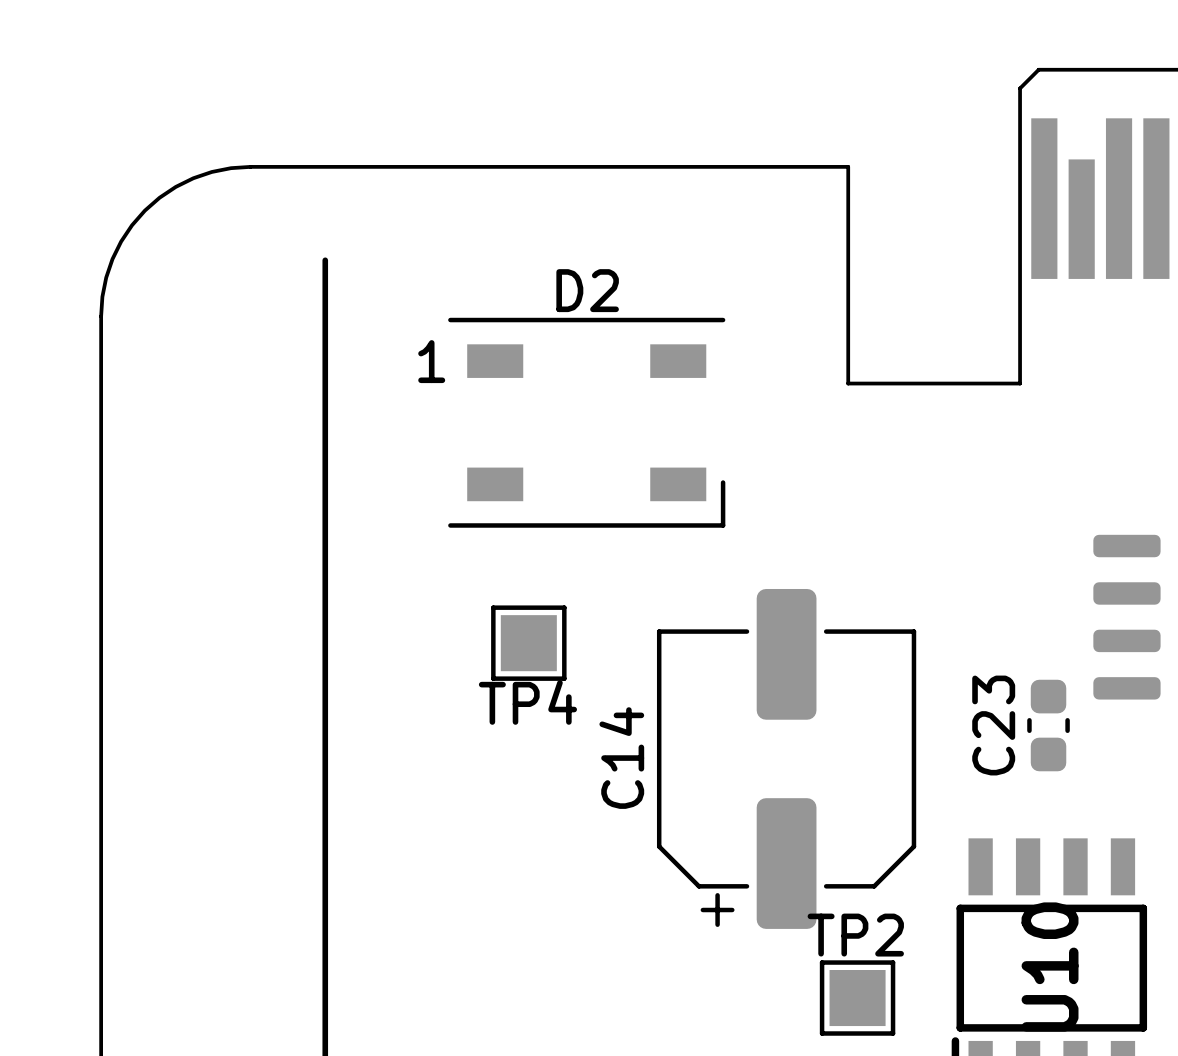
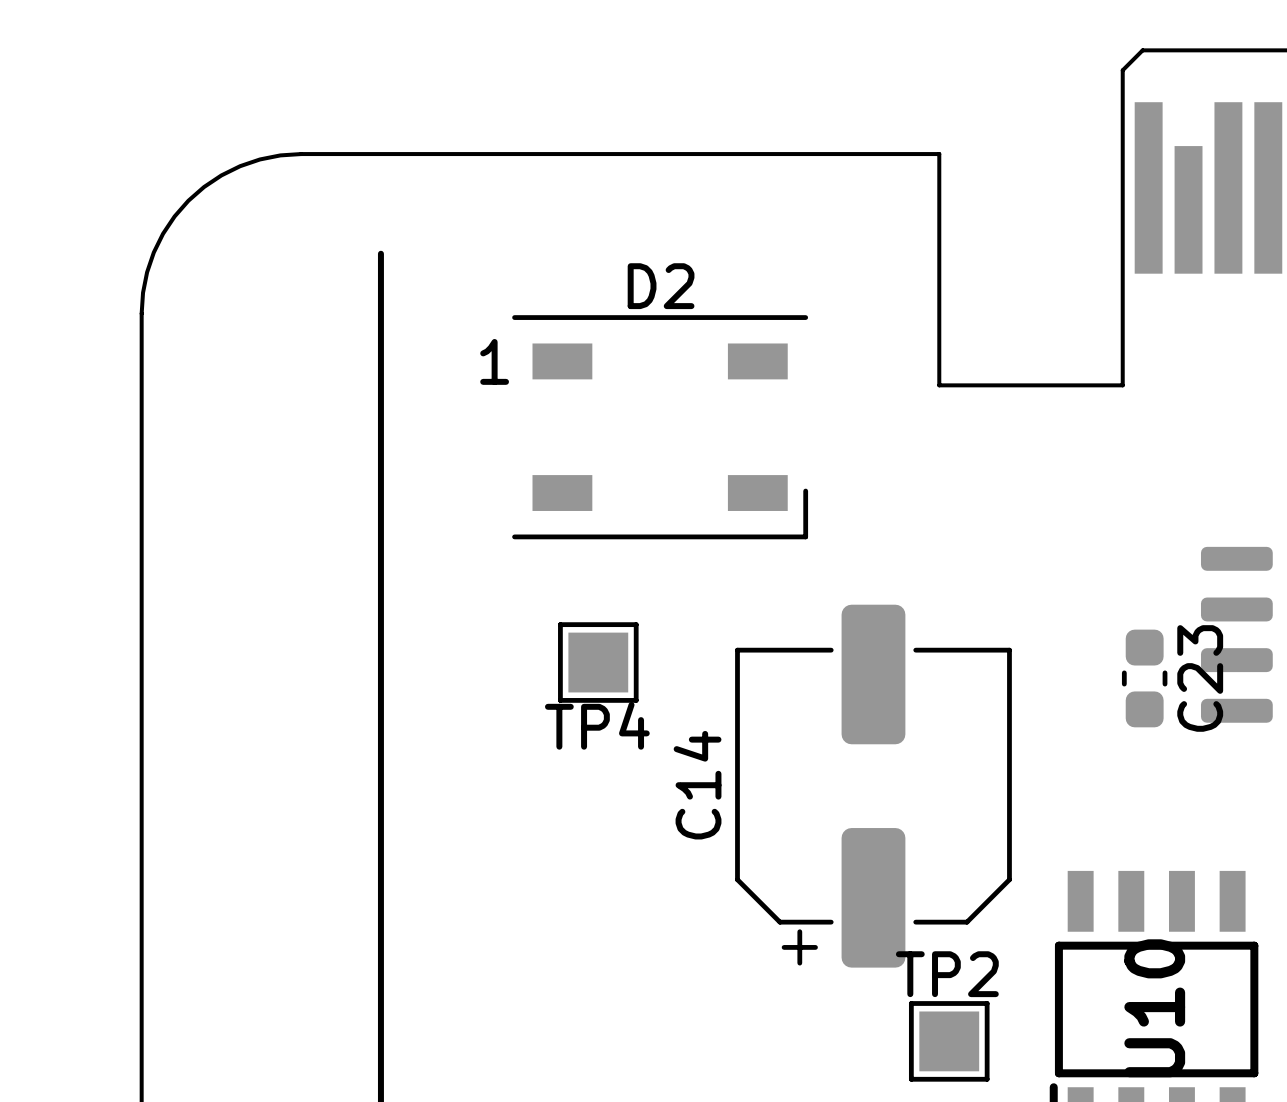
C23 name position: C23 (993, 725) -> C23 (1200, 678)
C23 position: (1048, 725) -> (1144, 678)

